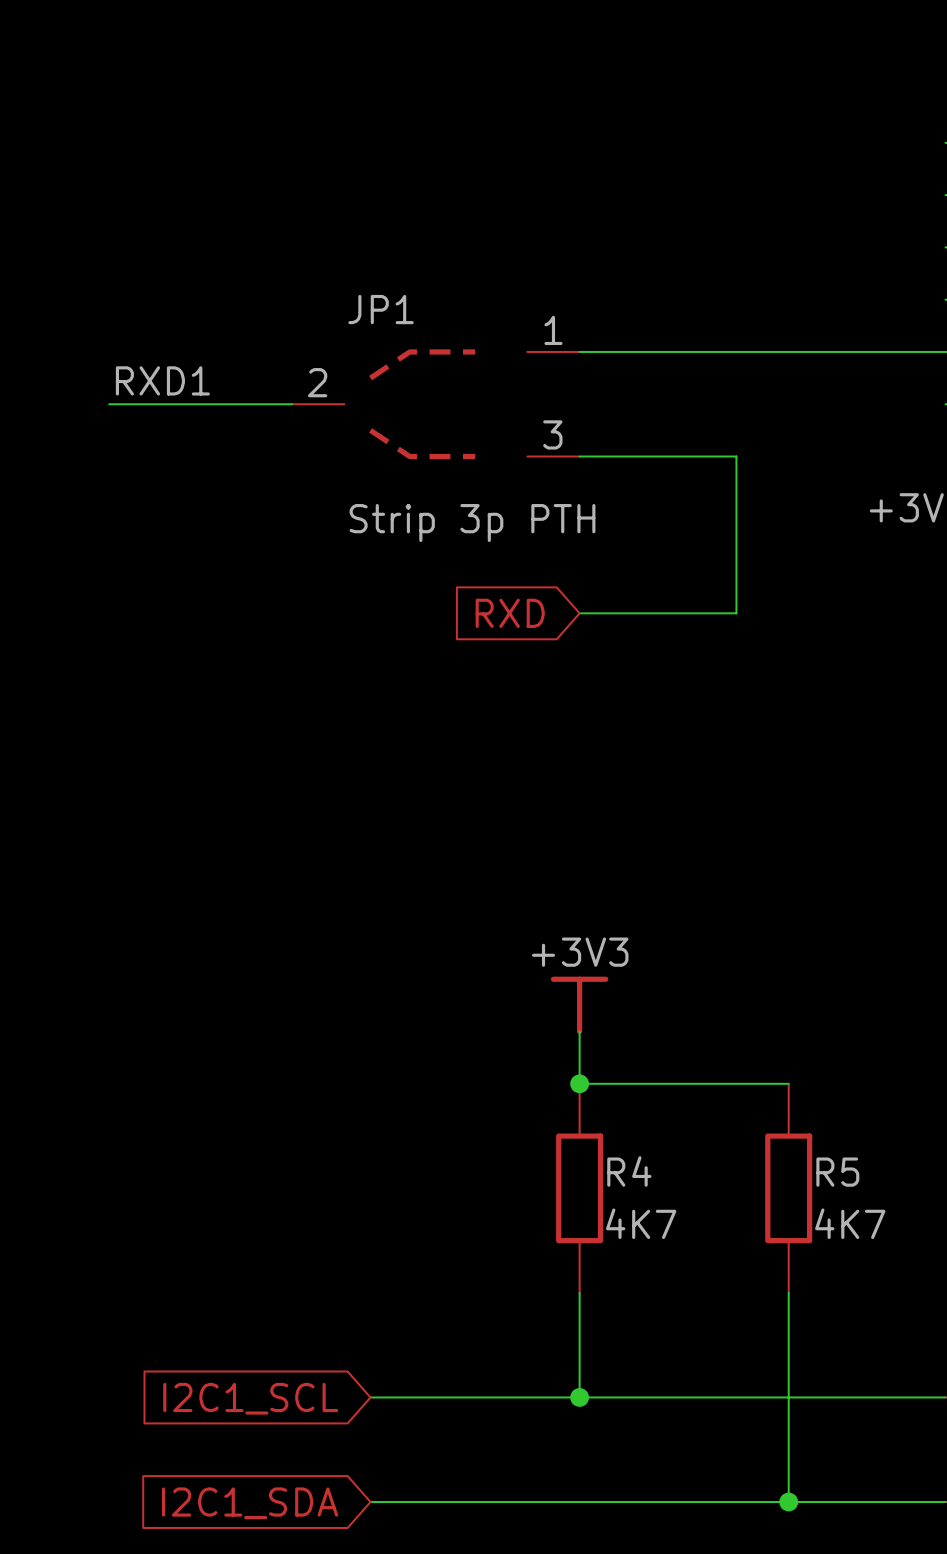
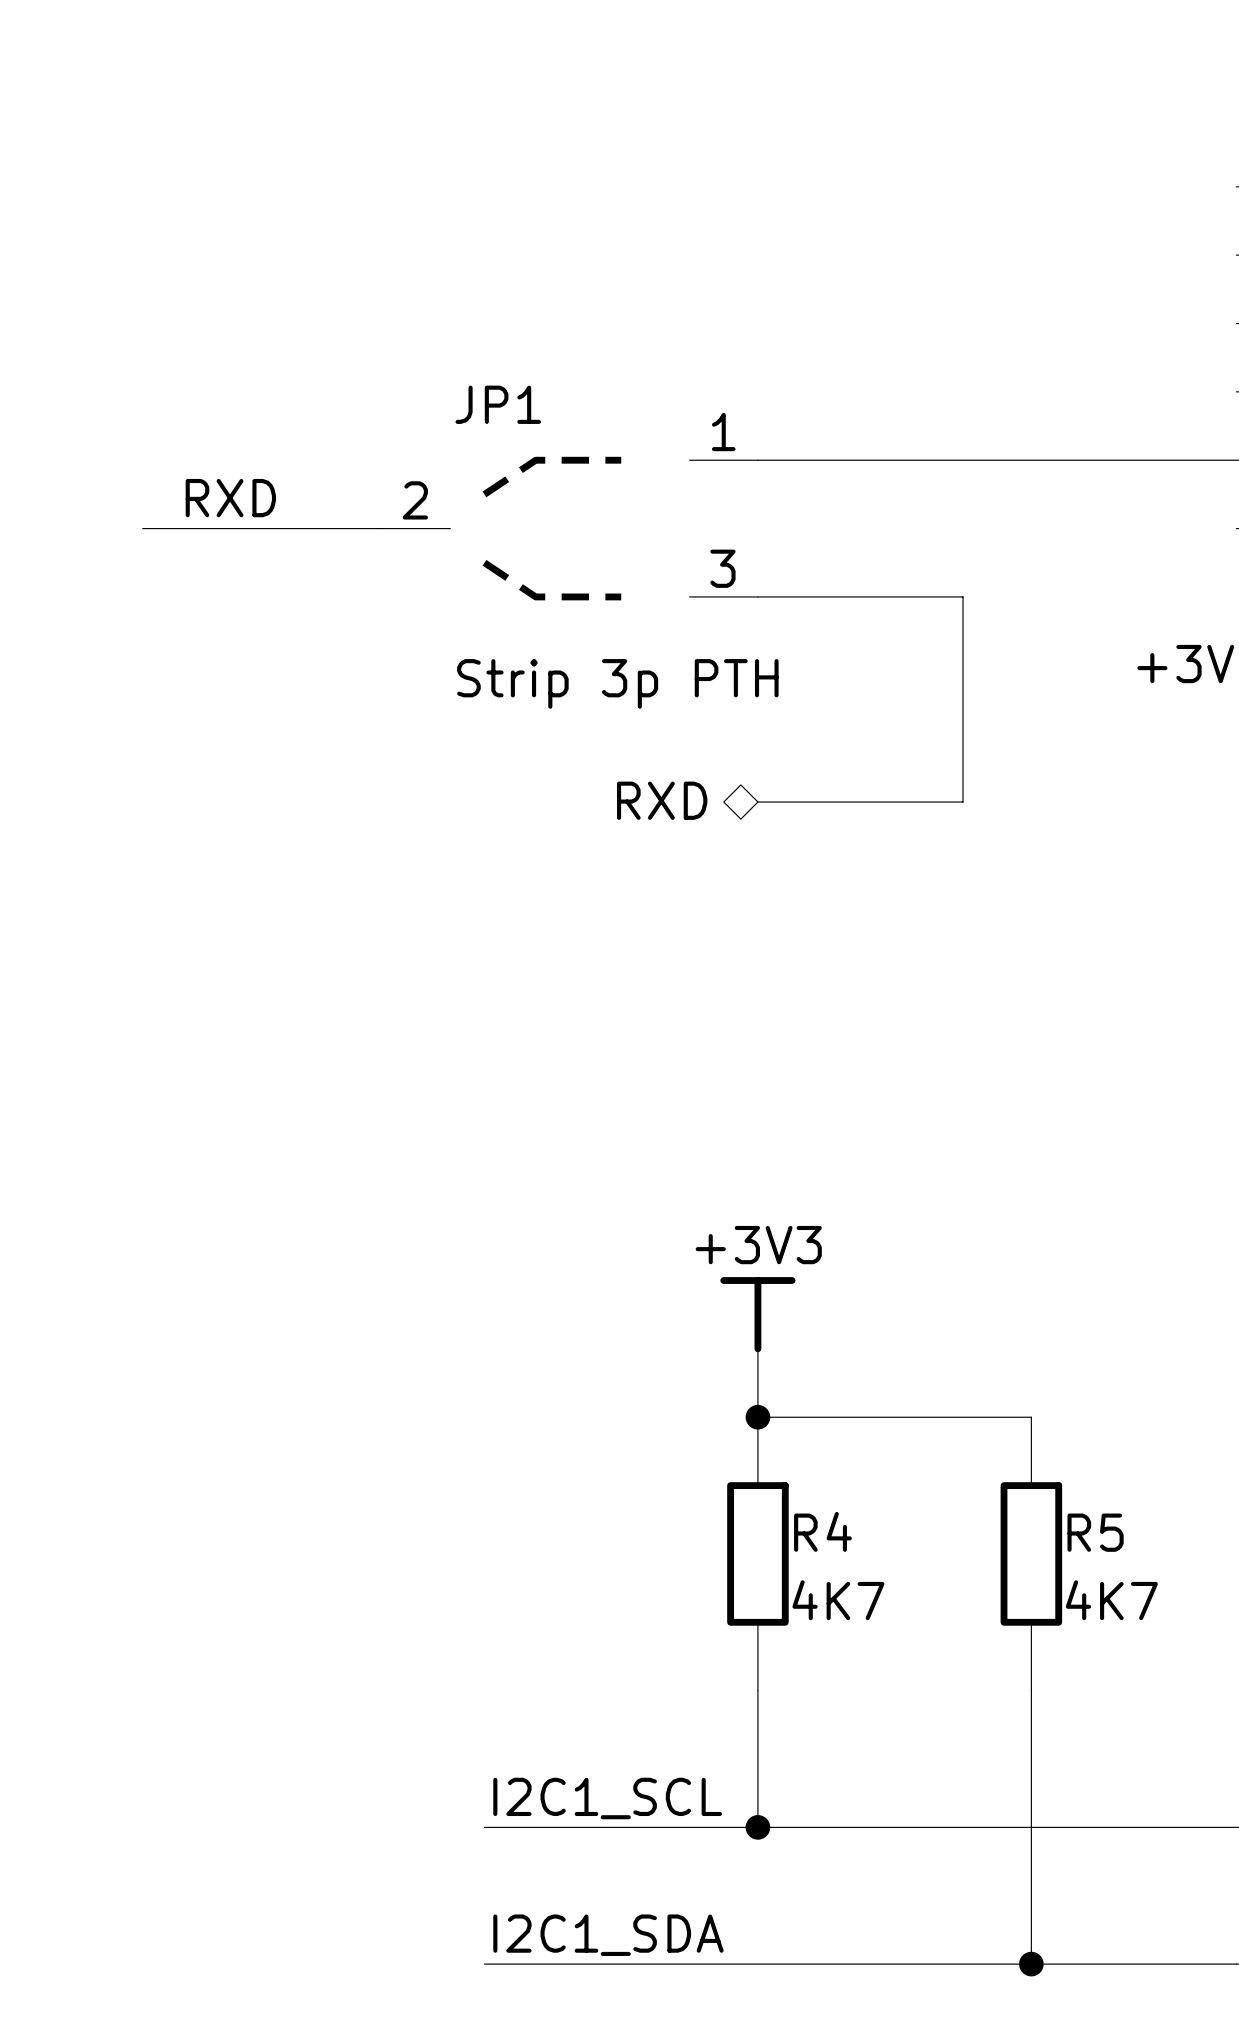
label: RXD1 (162, 380) -> RXD (230, 498)
hierarchical label: none -> RXD (662, 800)
global label: RXD (510, 613) -> none
label: none -> I2C1_SCL (607, 1798)
global label: I2C1_SCL (250, 1398) -> none
label: none -> I2C1_SDA (608, 1935)
global label: I2C1_SDA (250, 1503) -> none

